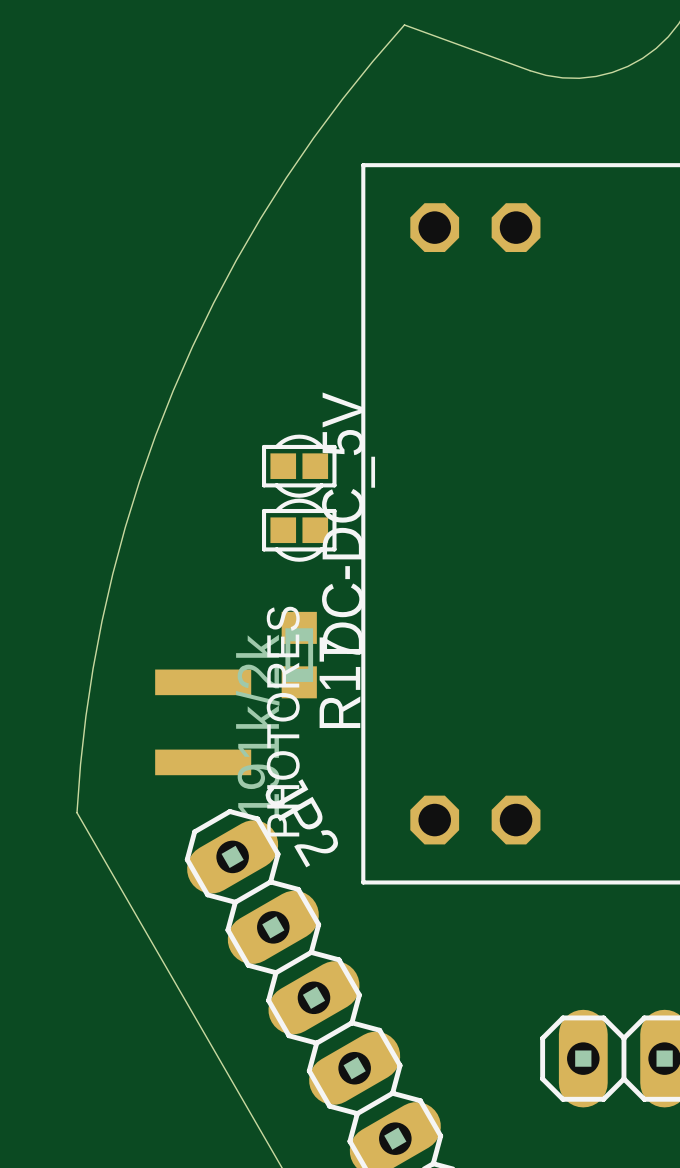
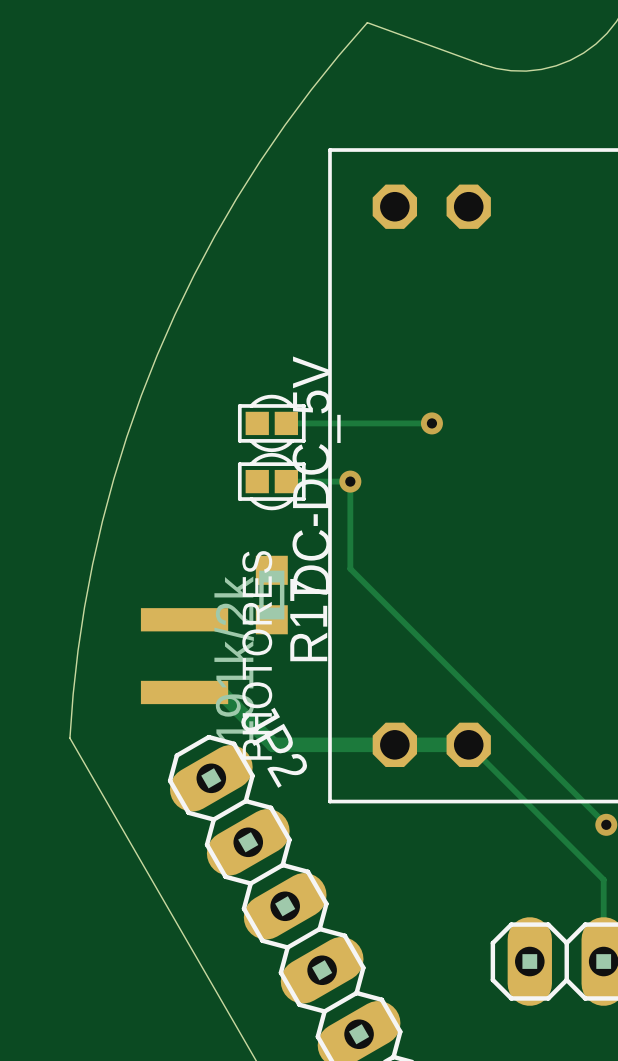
track: none -> (286, 423) (431, 423)
via: none -> (431, 423)
track: none -> (286, 481) (350, 481) (350, 568) (606, 824)
via: none -> (350, 481)
track: none -> (184, 692) (220, 692) (273, 744) (468, 744) (603, 879) (603, 970)
via: none -> (606, 824)

